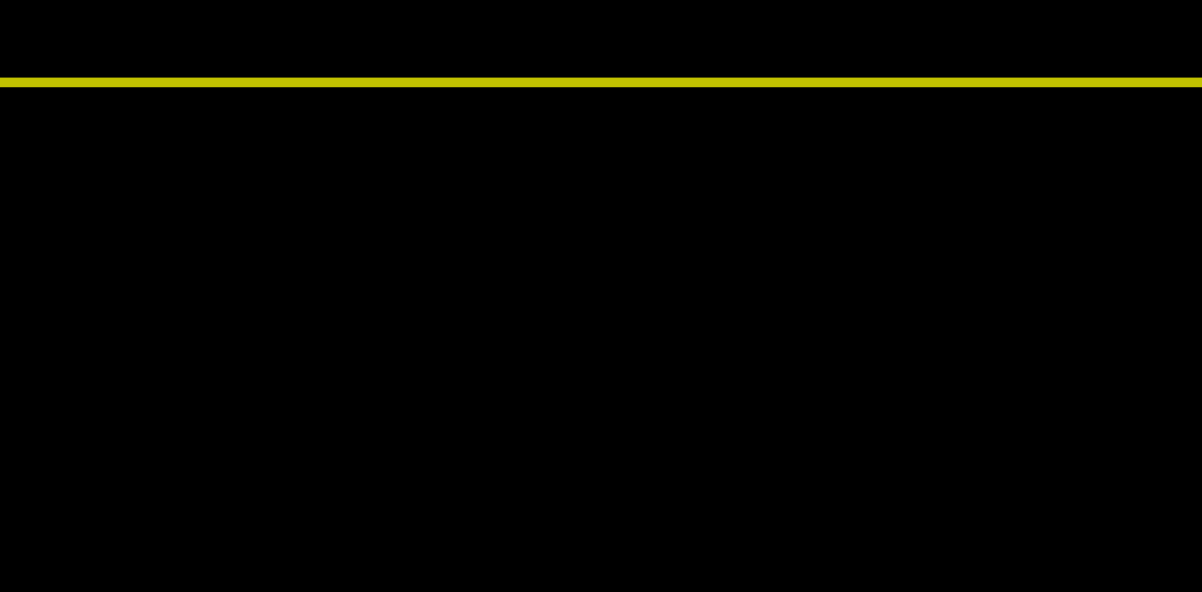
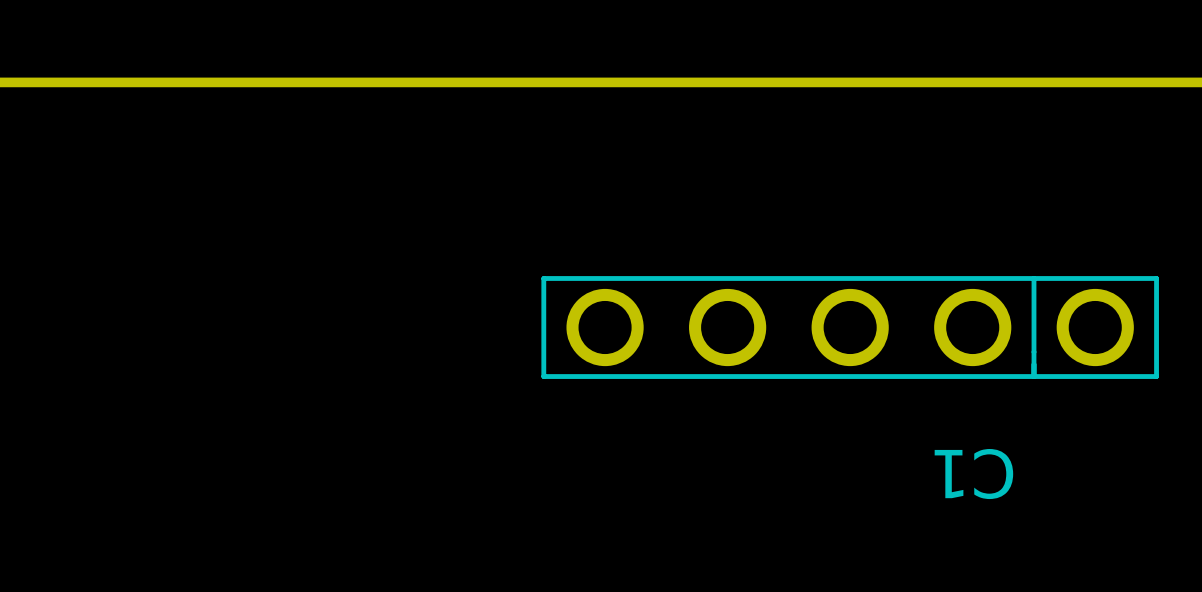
C1: none -> (850, 327)

